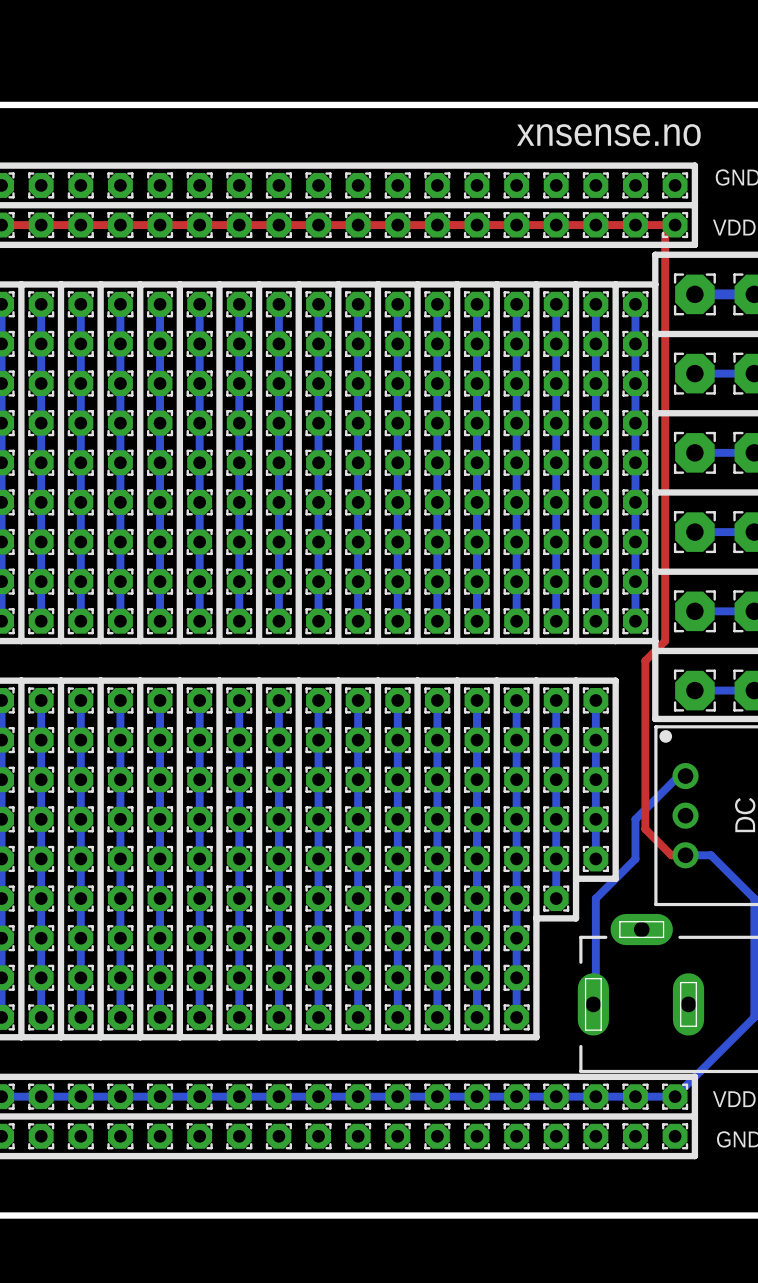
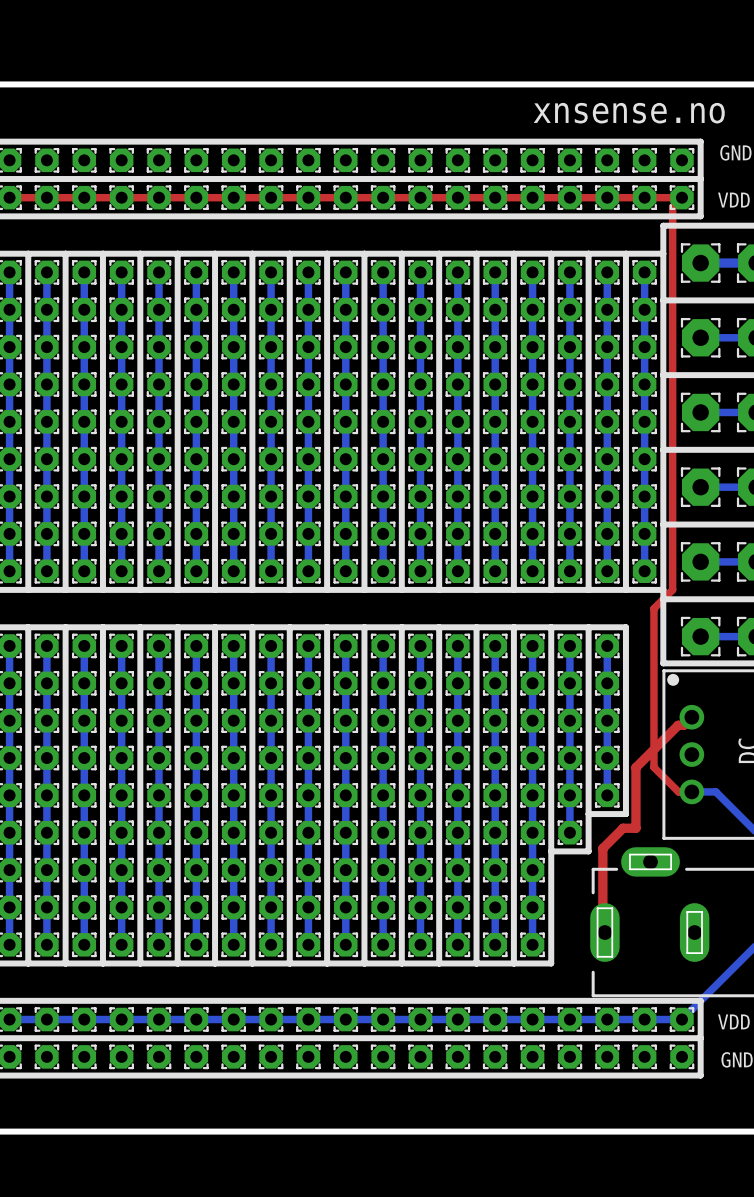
bottom track: (685, 776) (678, 776) (635, 819) (635, 858) (595, 898) (595, 1001) (593, 1004) -> none
top track: none -> (691, 717) (683, 725) (678, 725) (635, 767) (635, 828) (623, 828) (602, 848) (602, 931) (604, 932)

